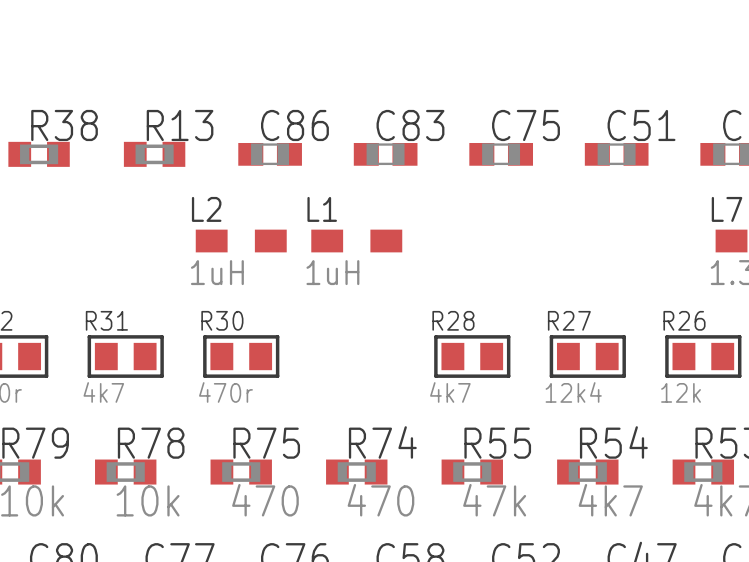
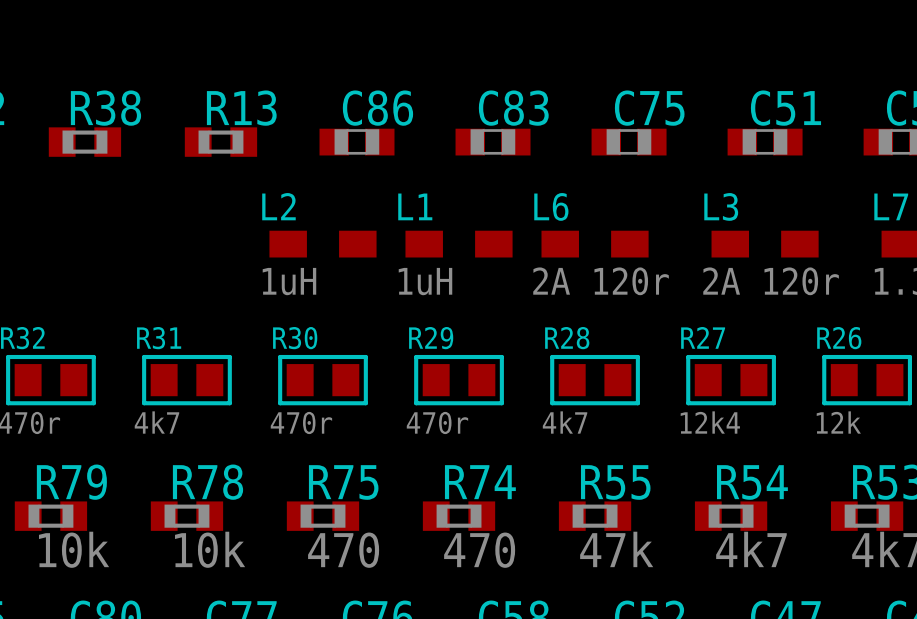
L6: none -> 2A 120r (595, 244)
L3: none -> 2A 120r (765, 244)
R29: none -> 470r (459, 380)

